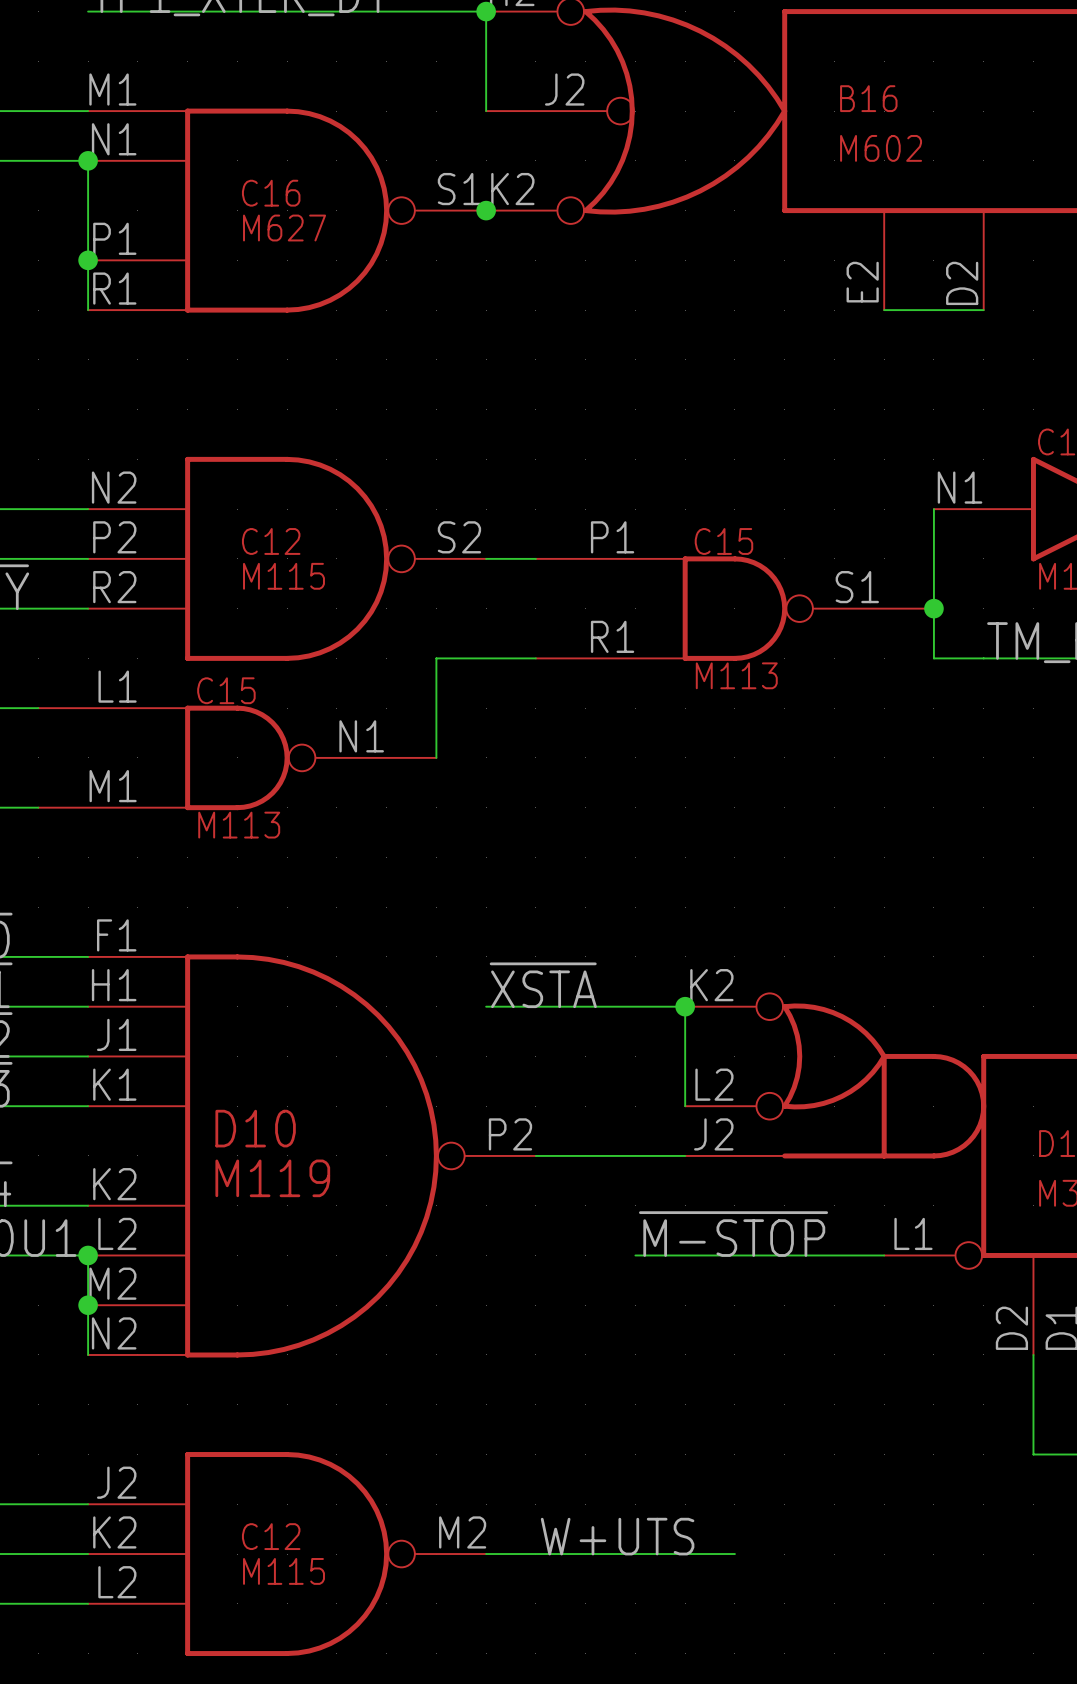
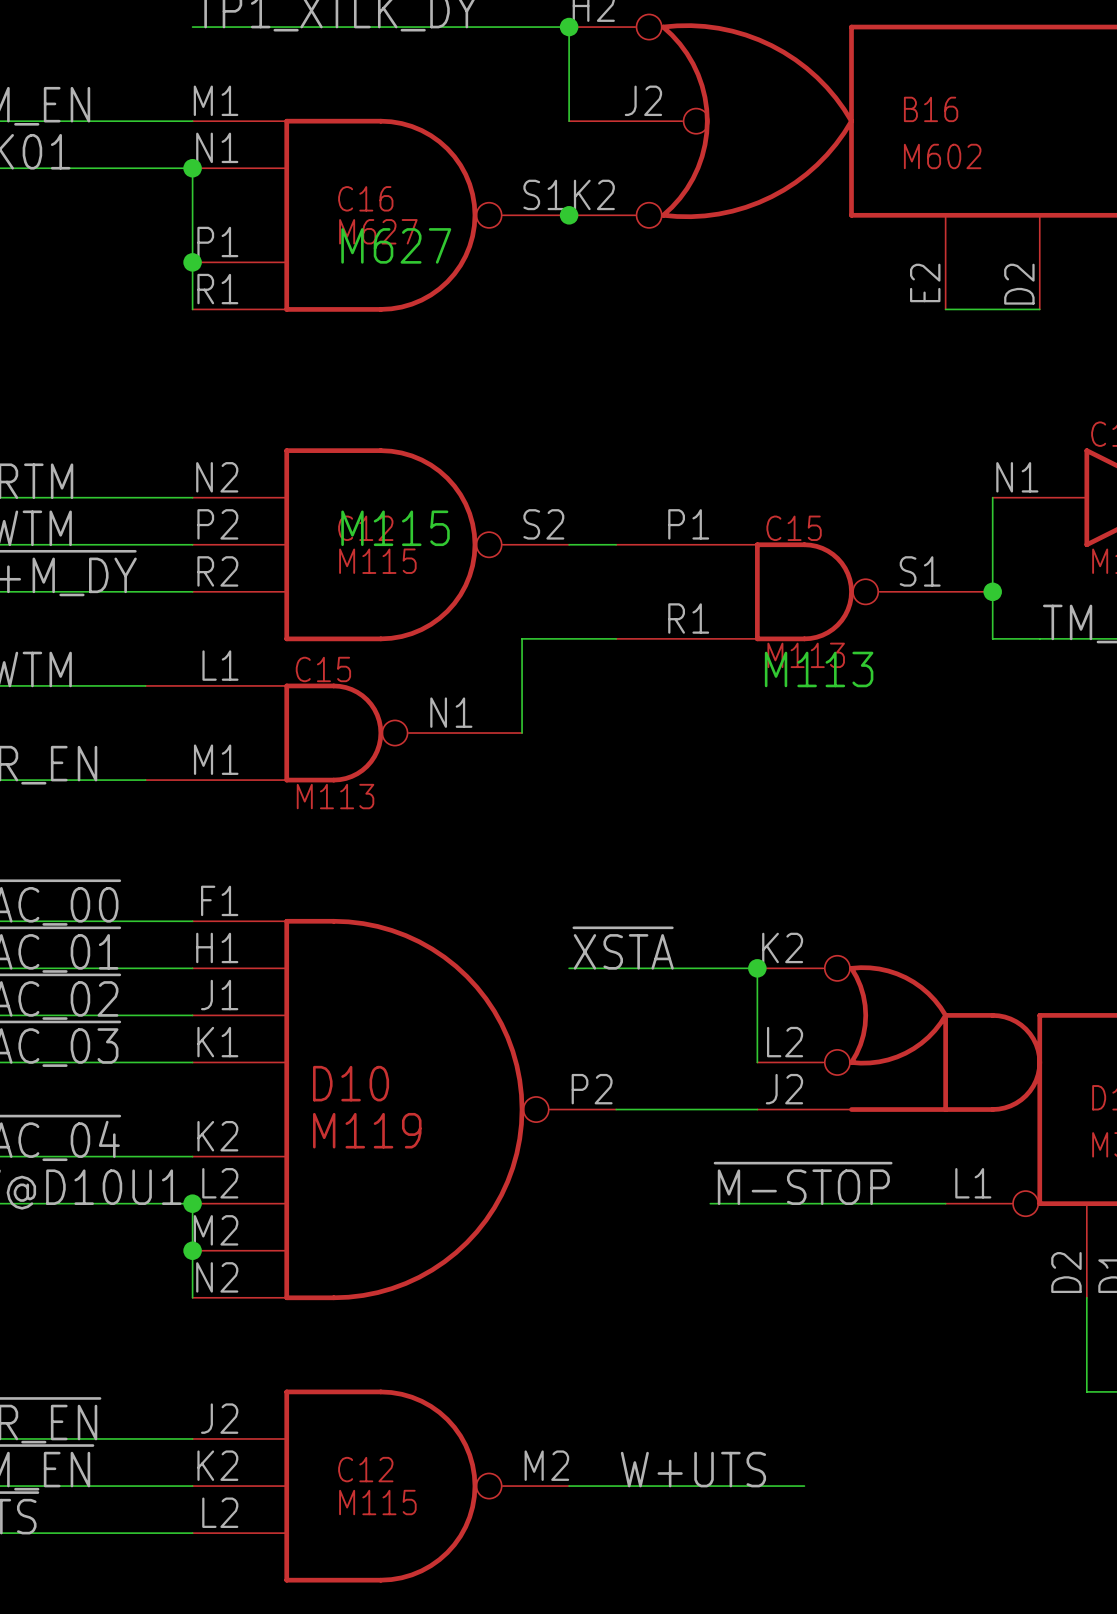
text: none -> M627 (396, 245)
text: none -> M115 (395, 528)
text: none -> M113 (819, 669)

